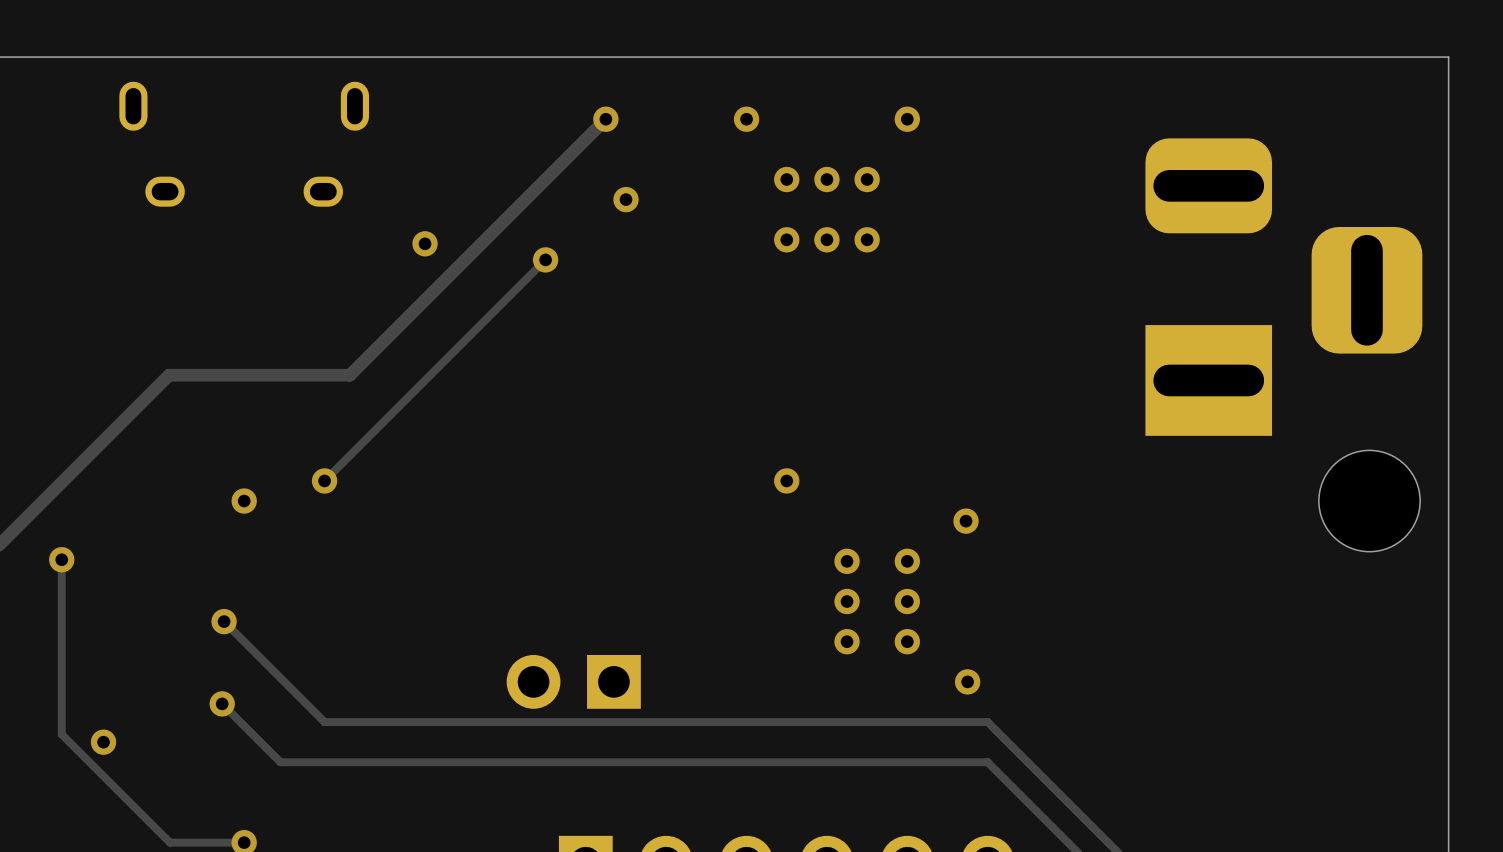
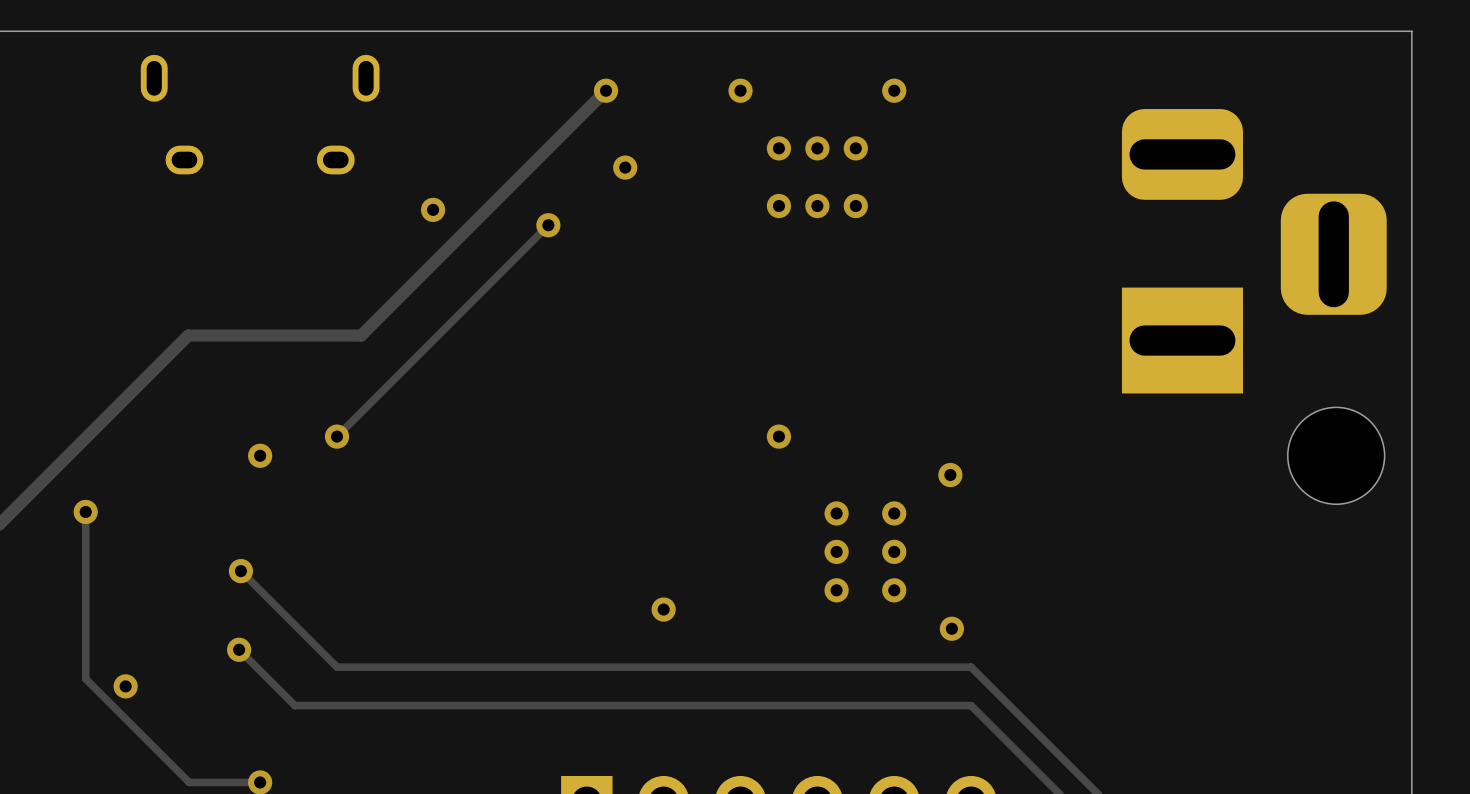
via: none -> (663, 609)
part: (573, 681) -> none

